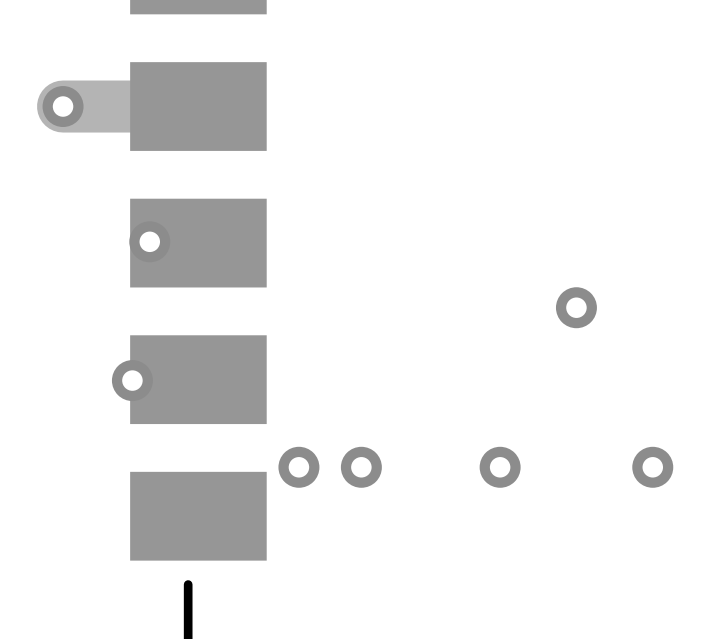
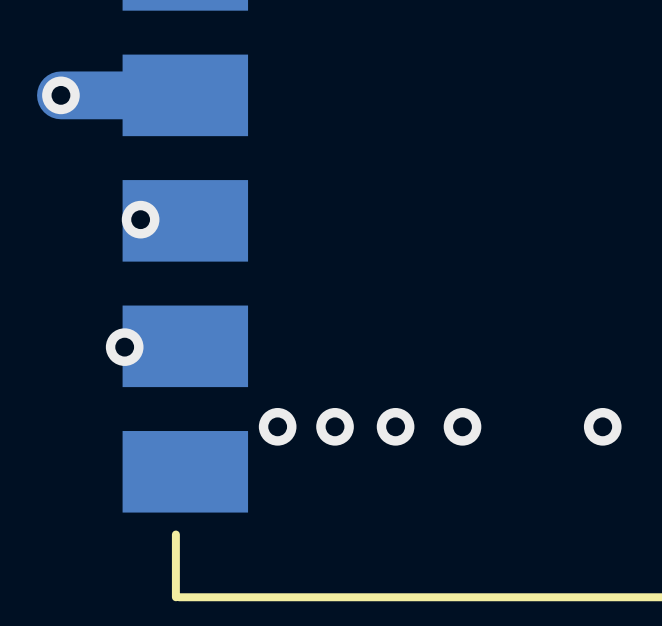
via position: (576, 307) -> (395, 426)

